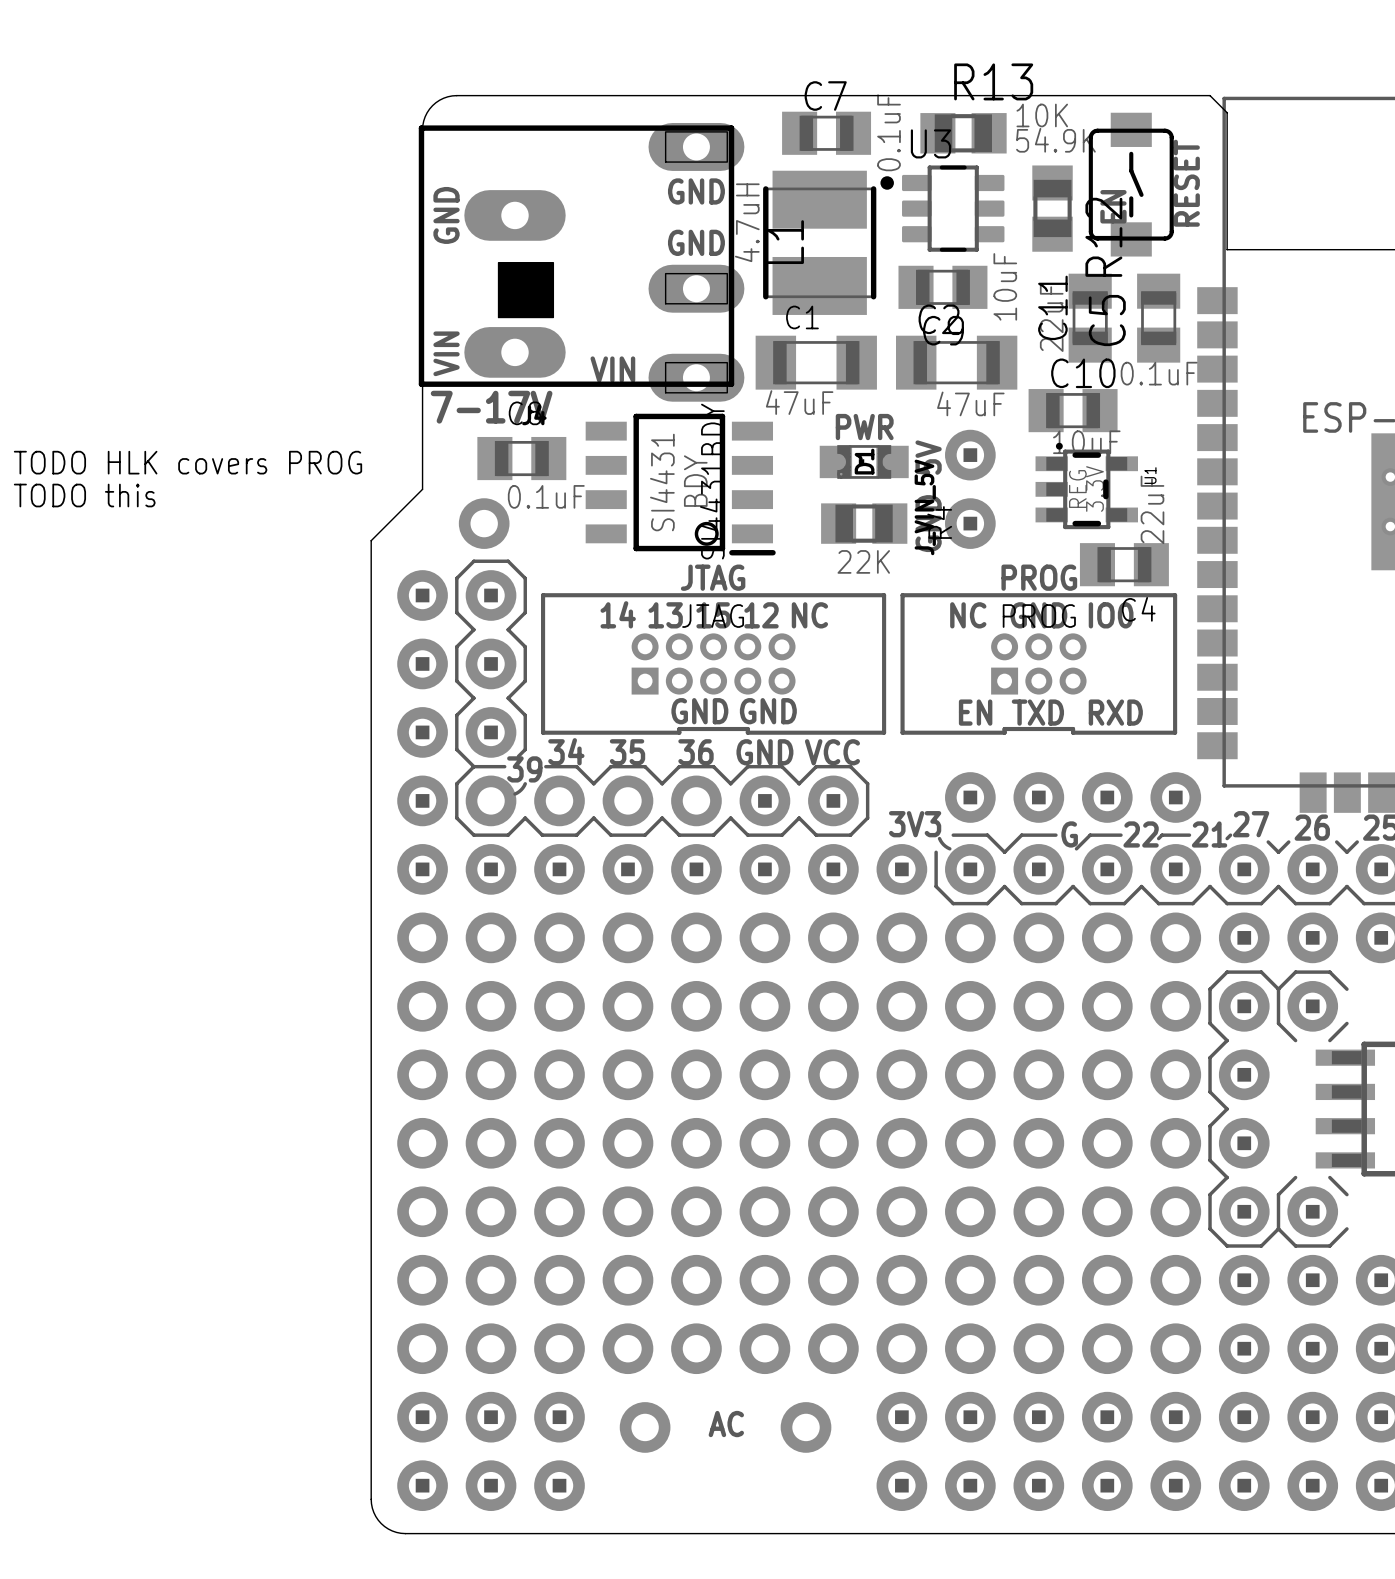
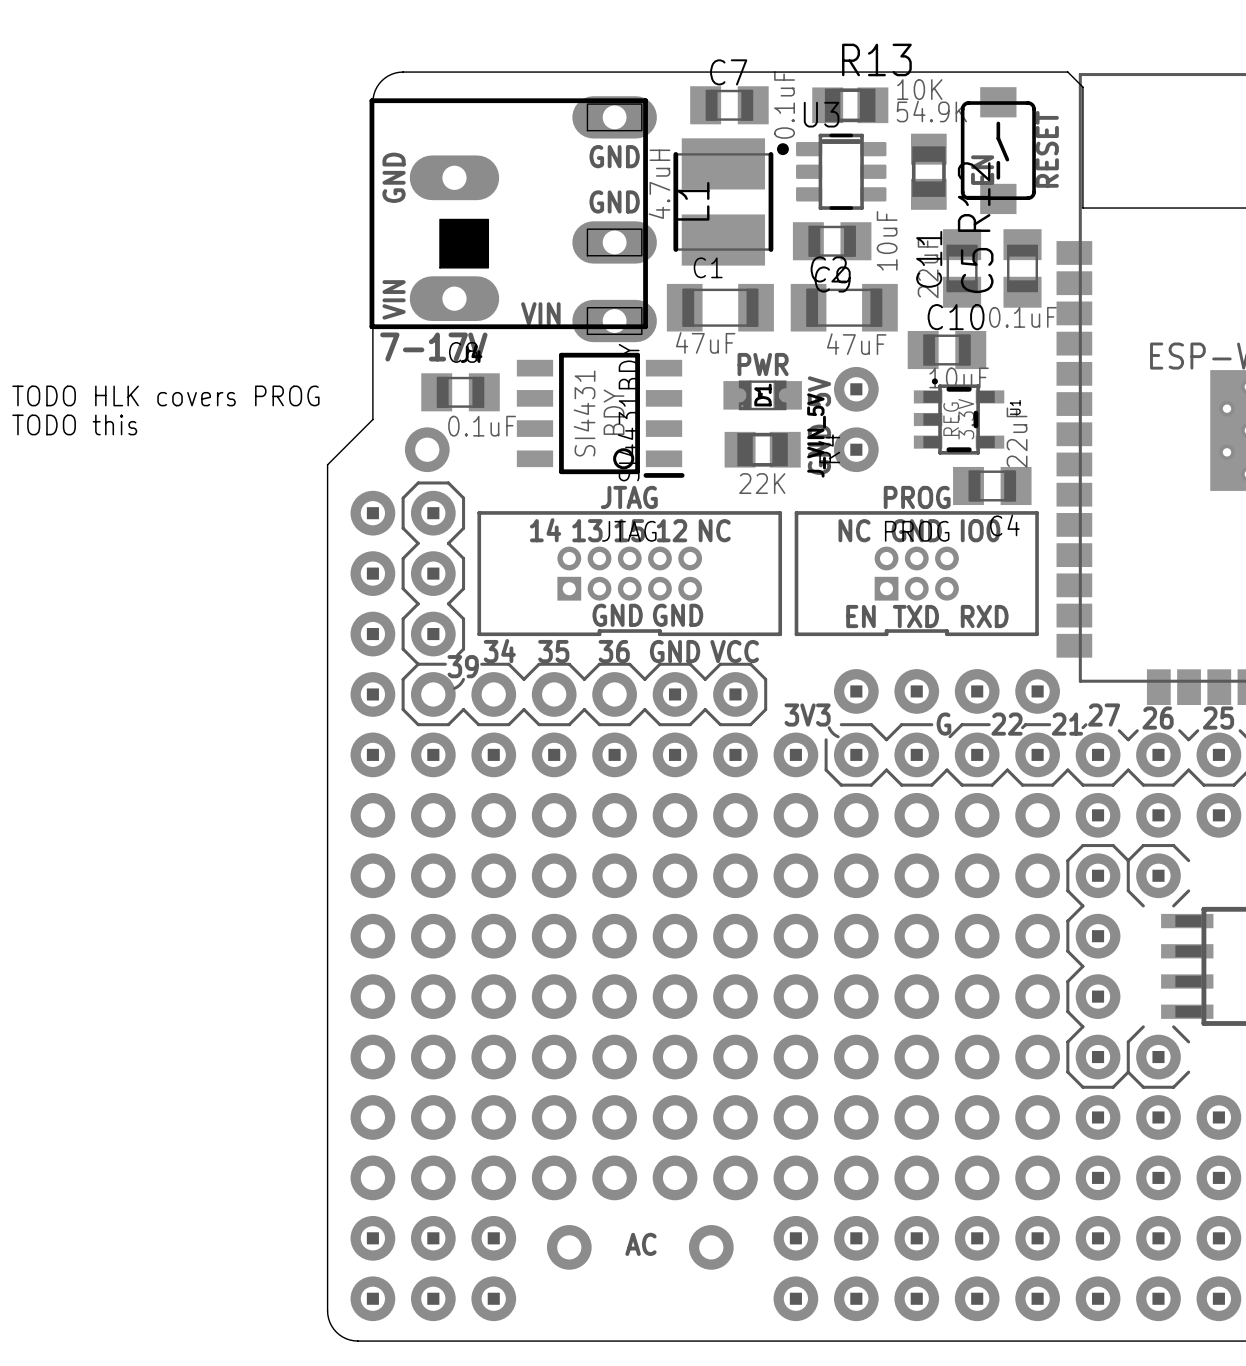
line: none -> (823, 141) (859, 141)

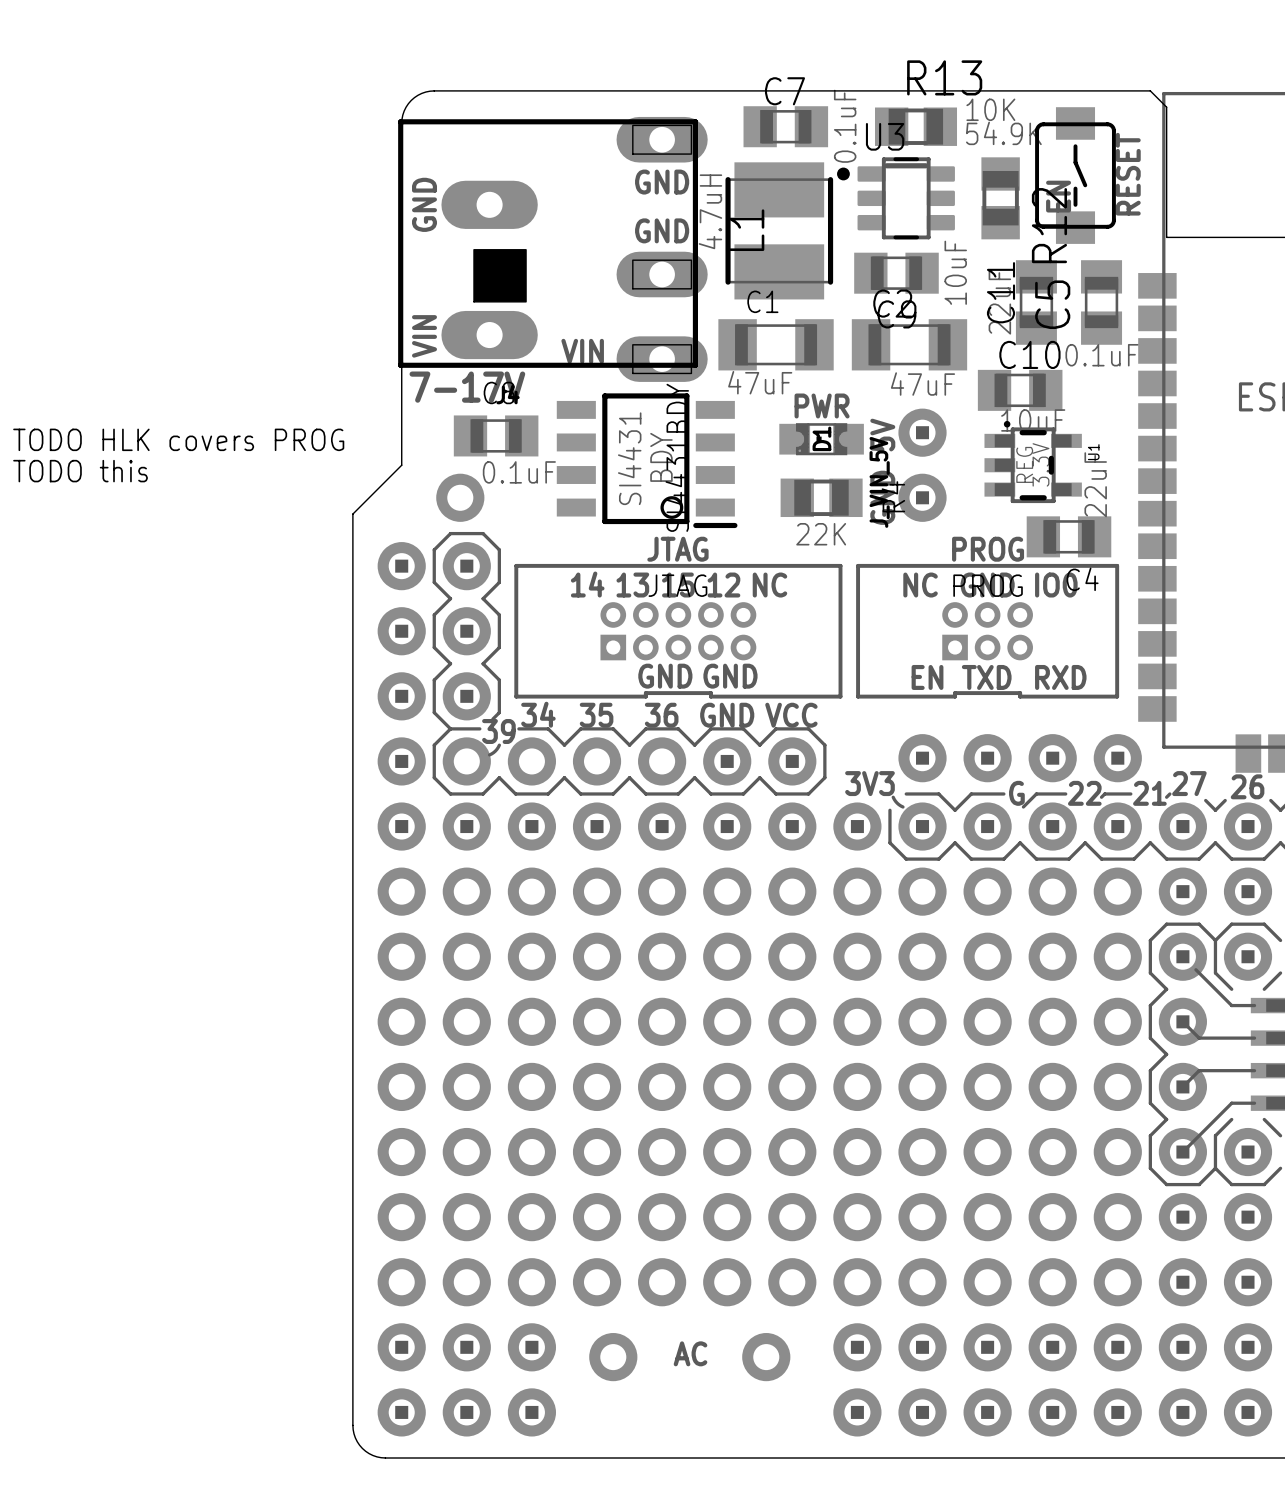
line: none -> (1195, 969) (1231, 1005) (1254, 1005)
line: none -> (1186, 1025) (1199, 1038) (1254, 1038)
line: none -> (1254, 1070) (1199, 1070) (1182, 1086)
line: none -> (1254, 1103) (1231, 1103) (1182, 1152)

